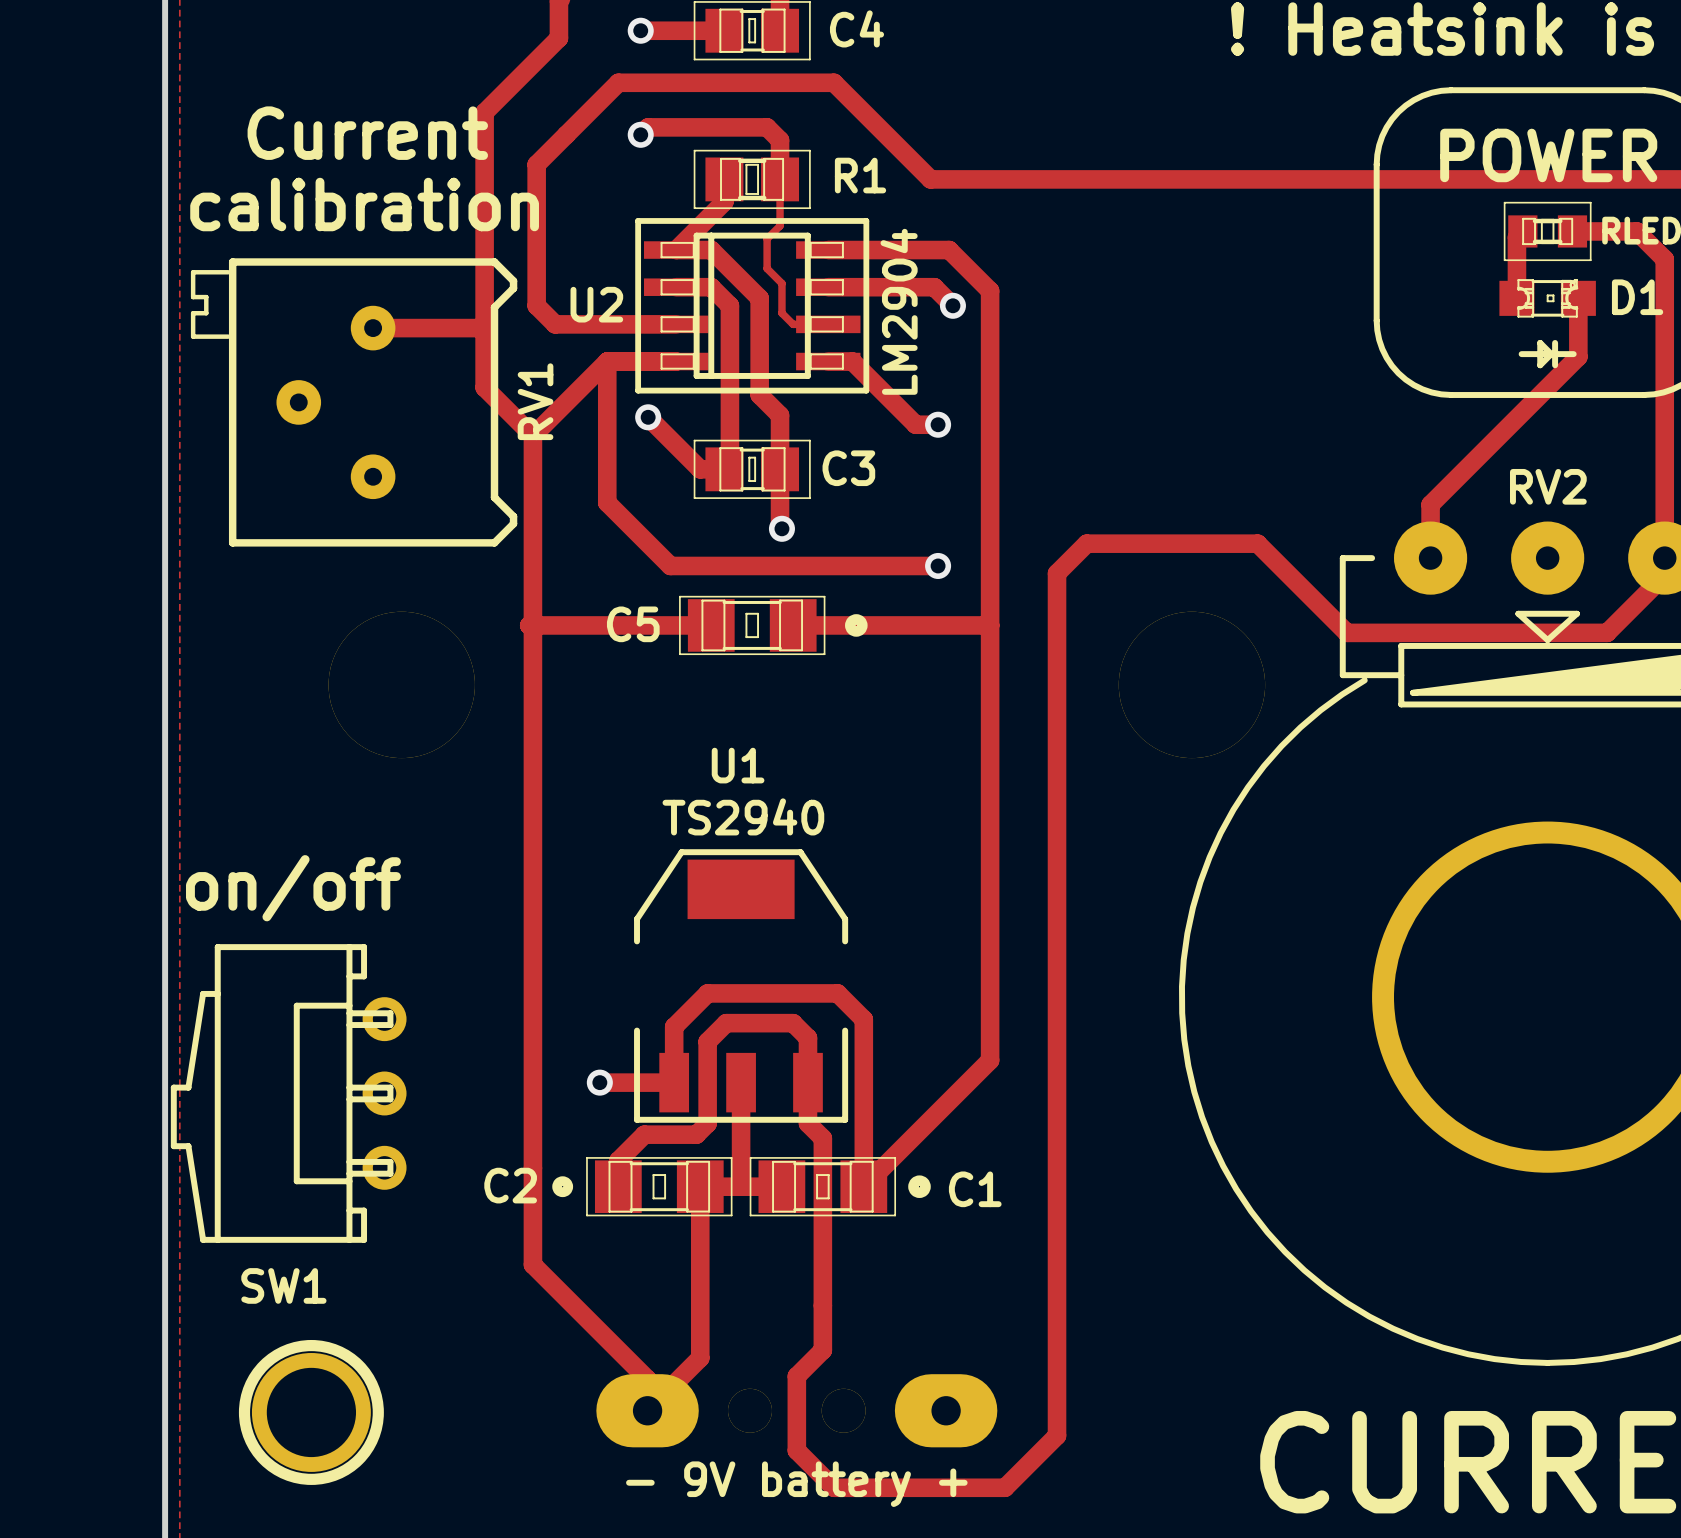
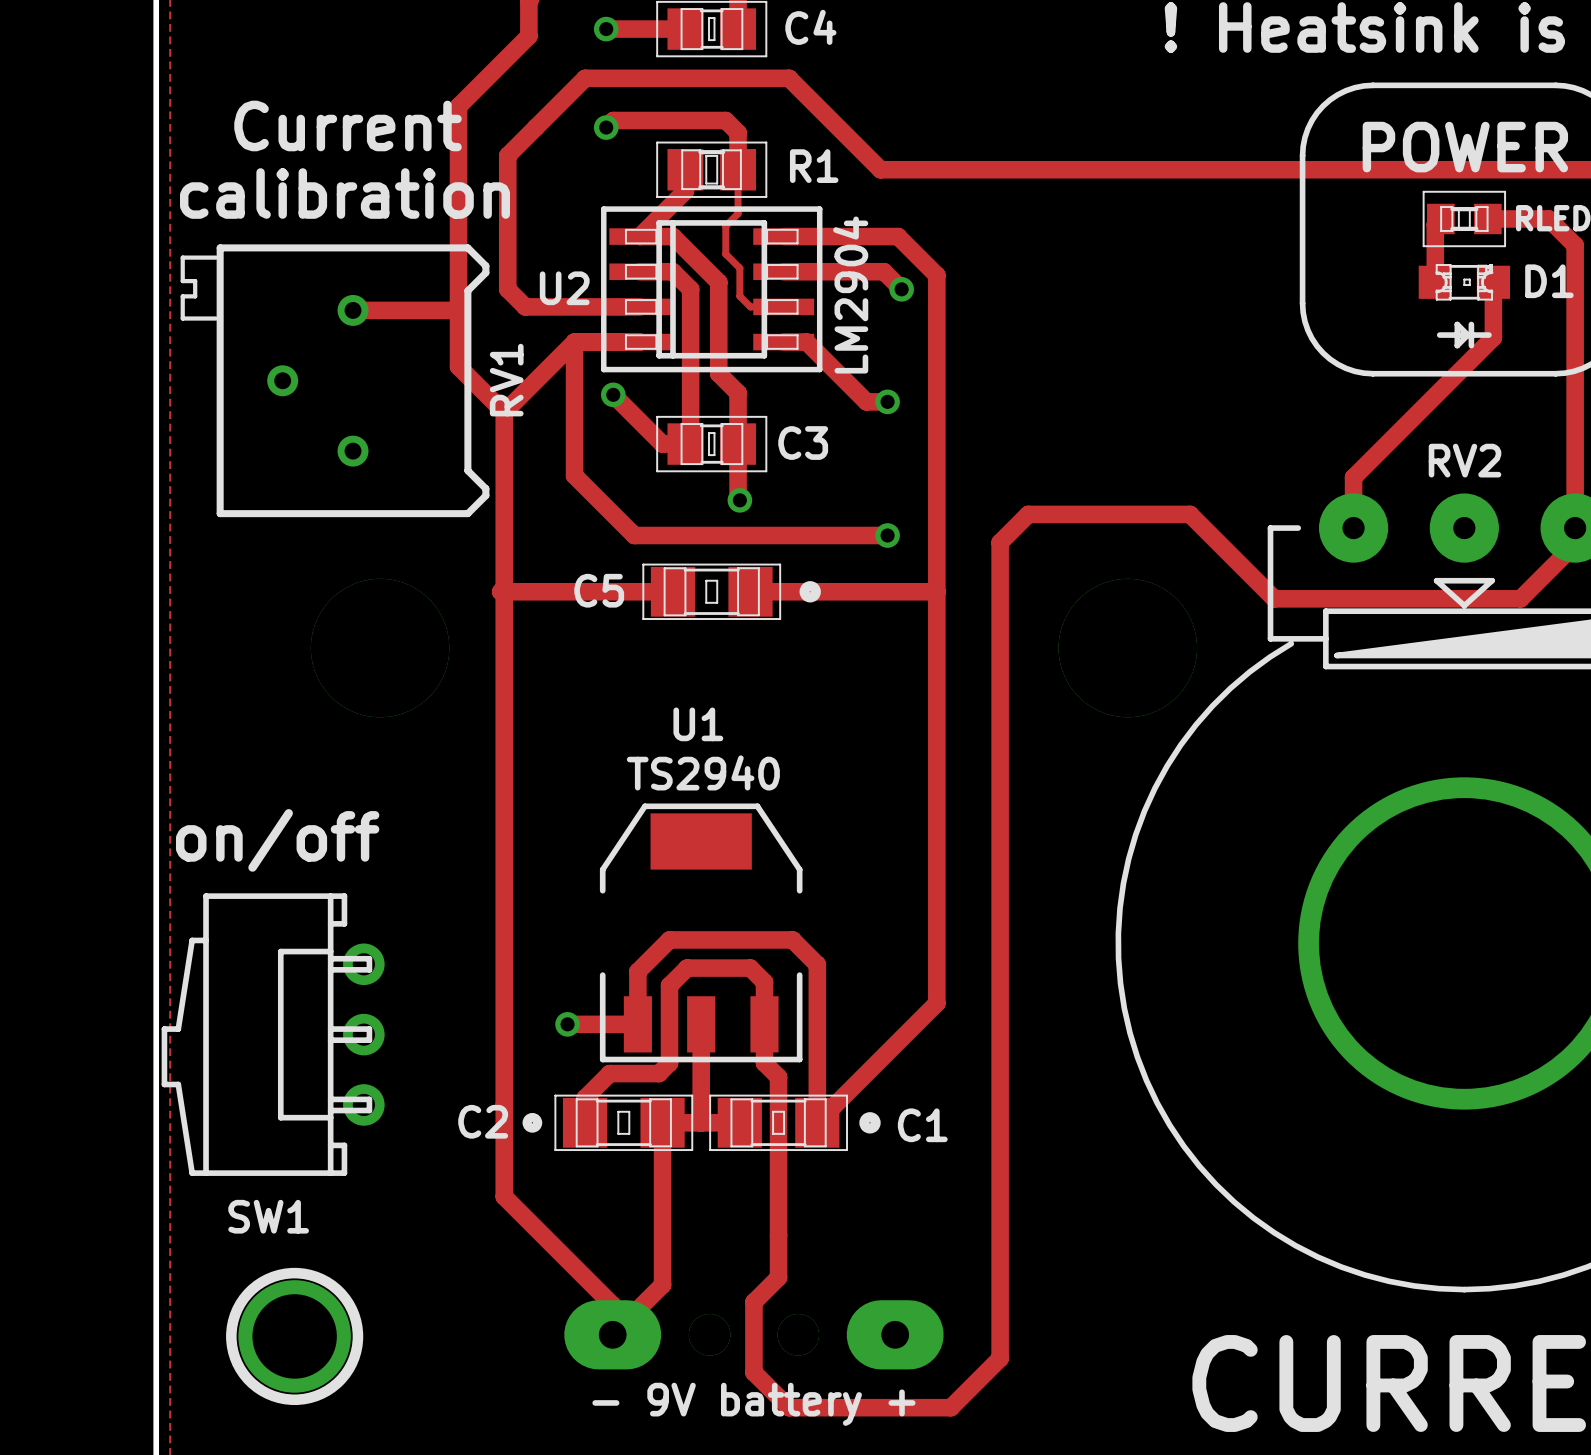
RV1 footprint: [190, 258, 518, 547] -> [180, 244, 490, 518]

